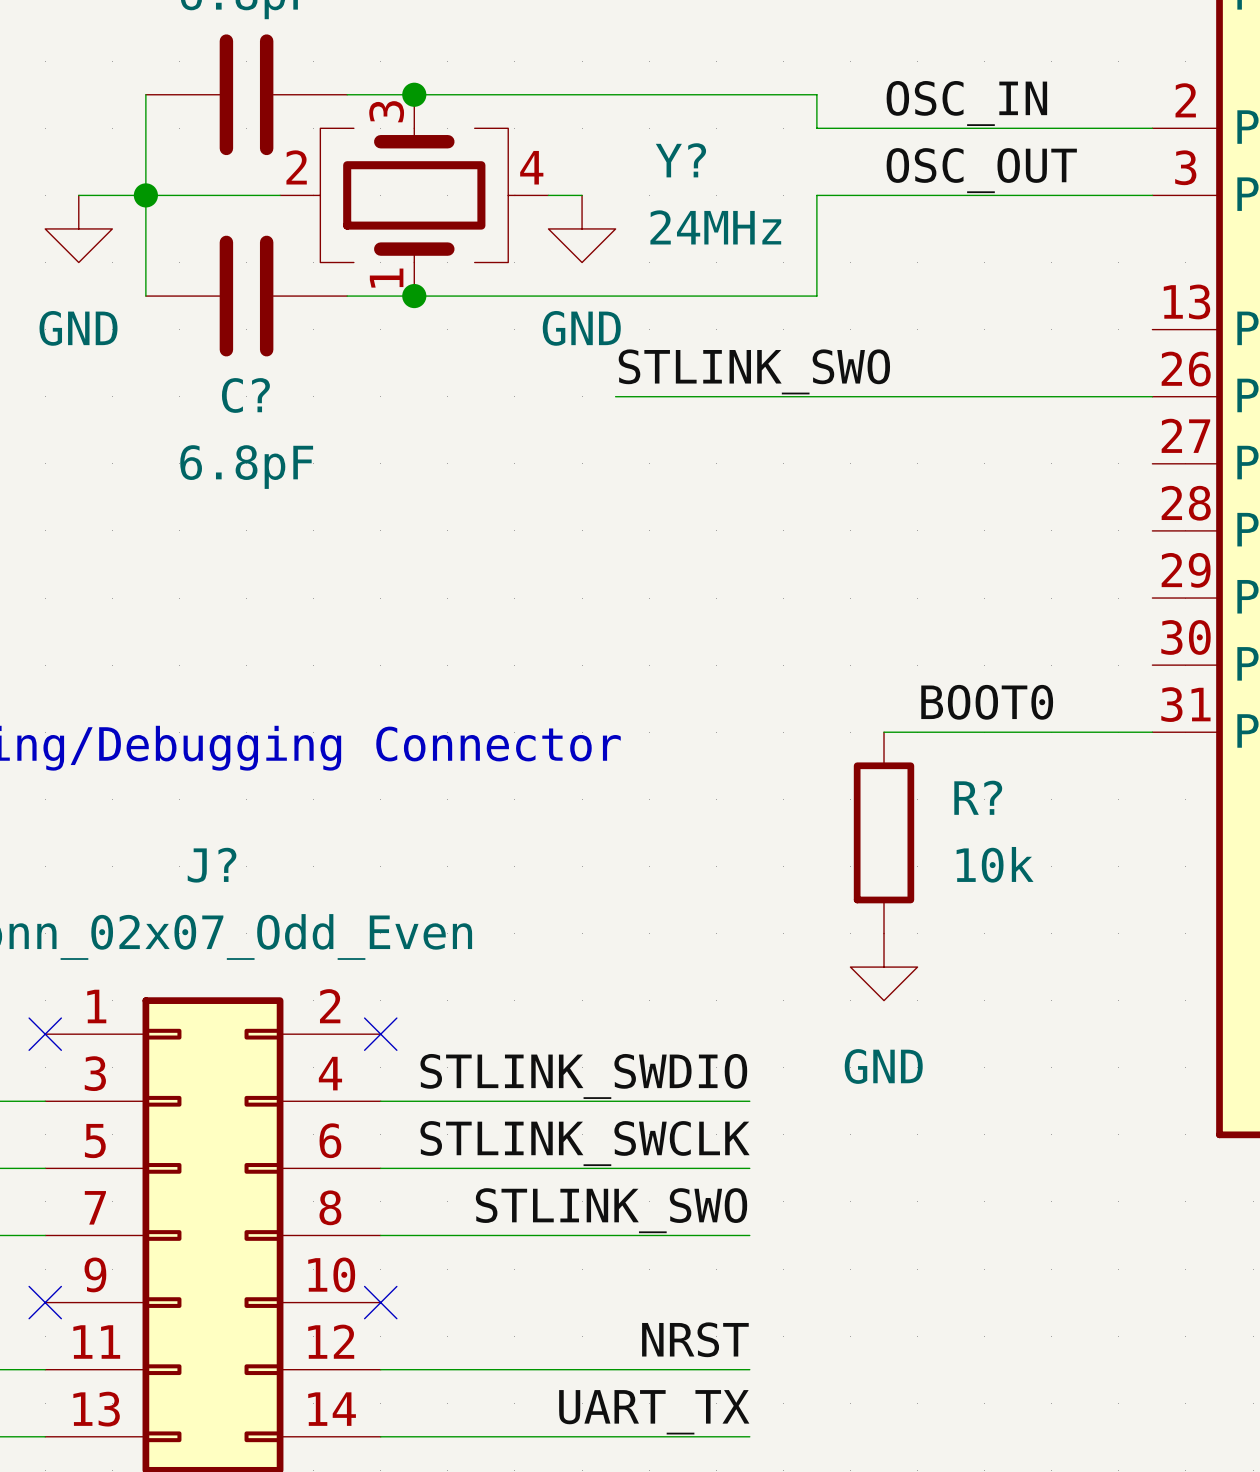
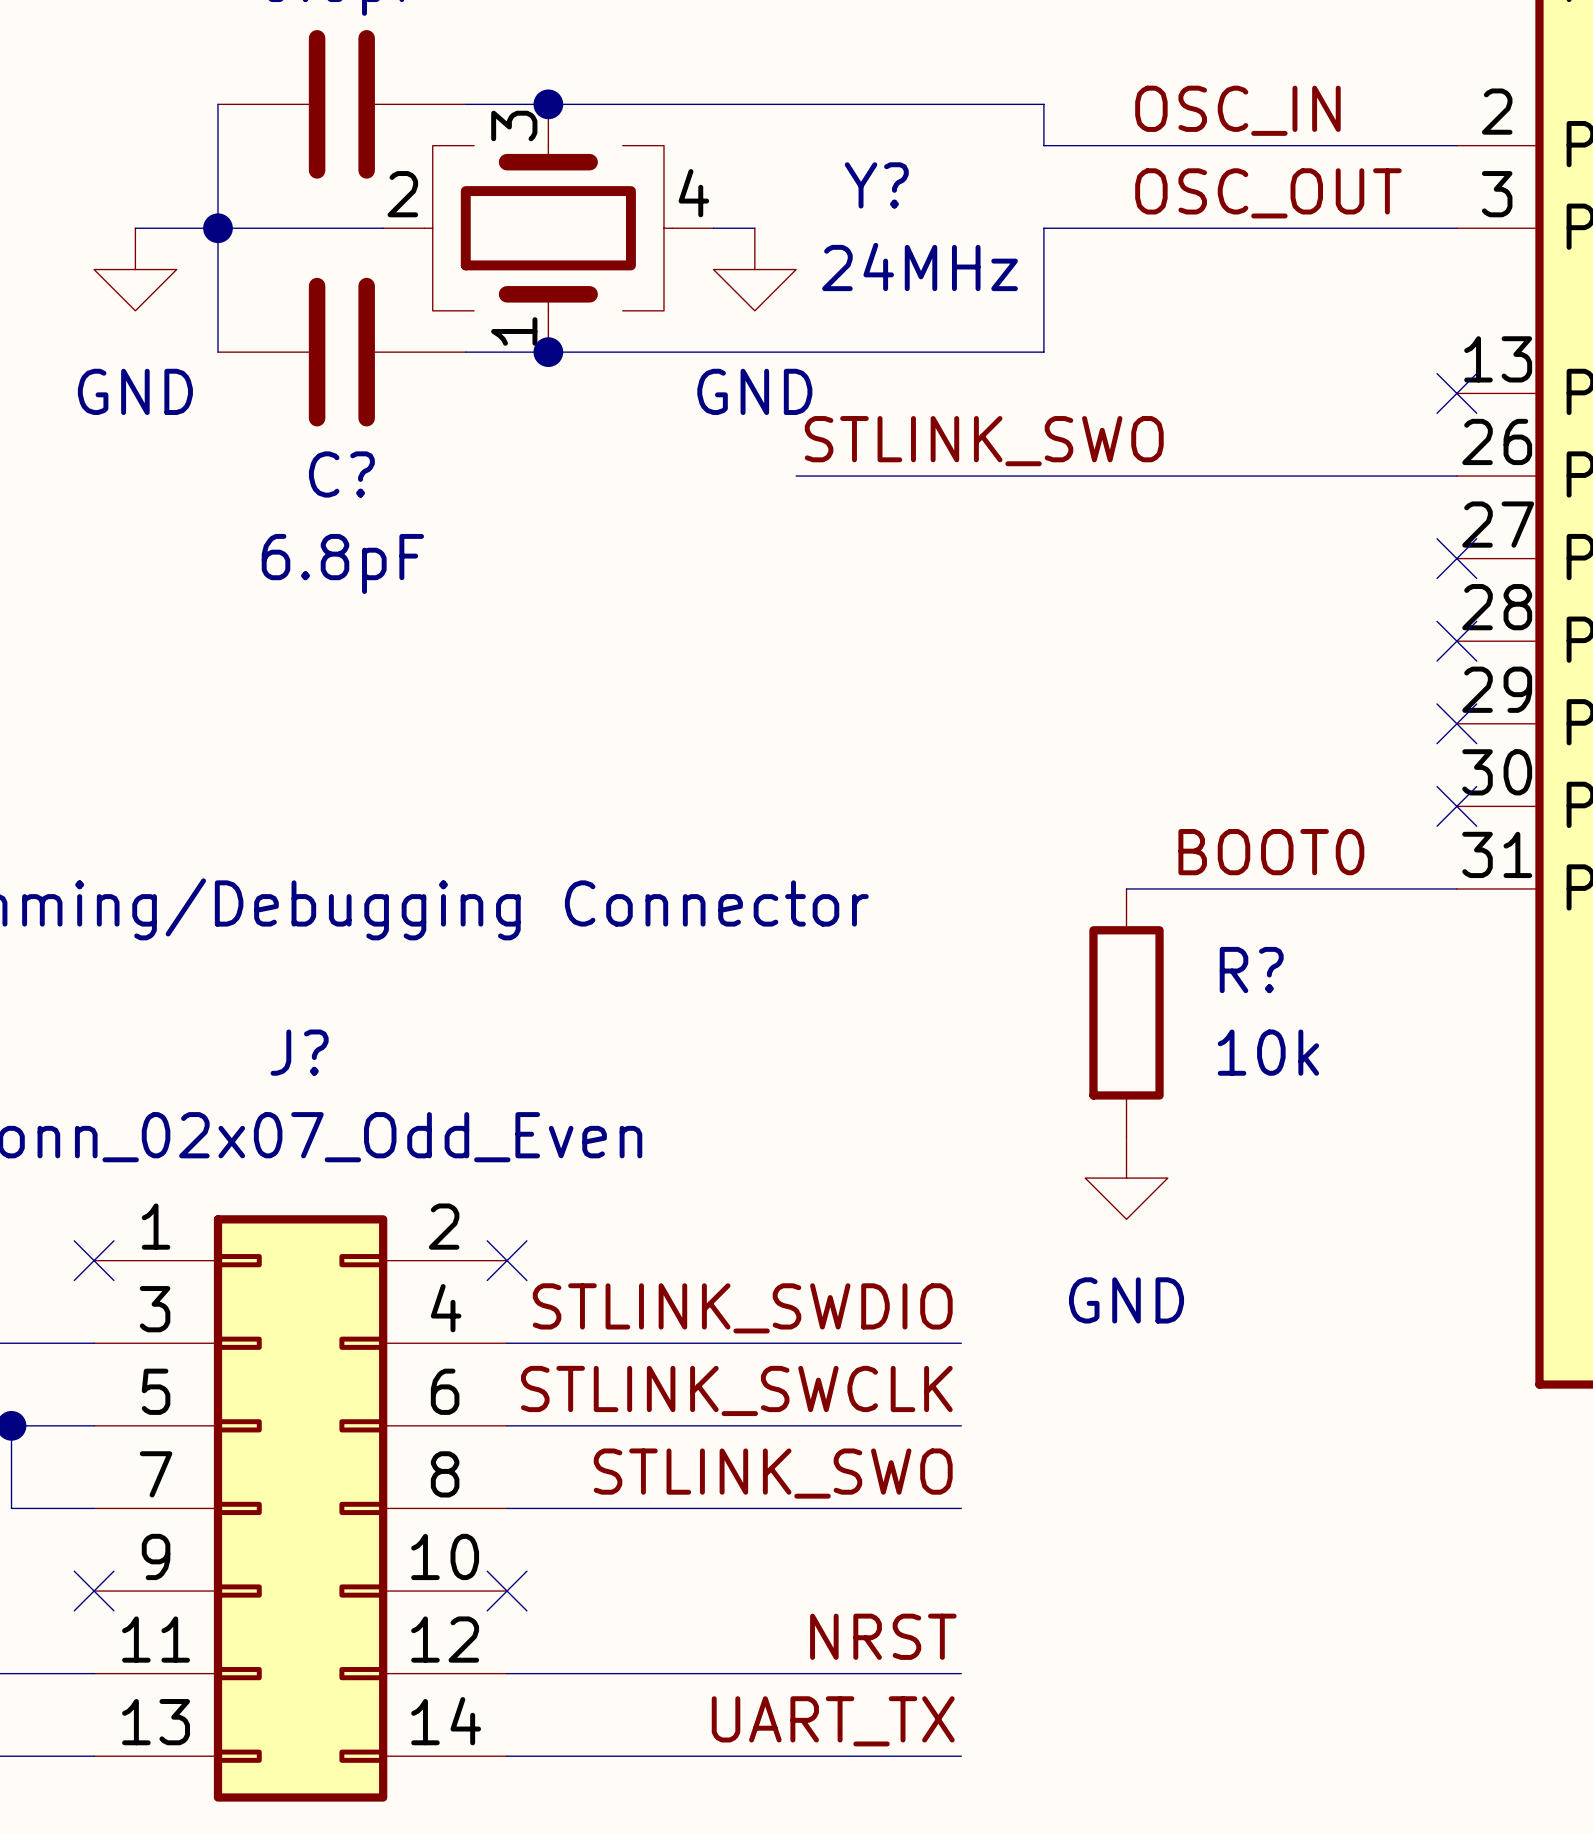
no-connect mark: none -> (1456, 393)
no-connect mark: none -> (1456, 558)
no-connect mark: none -> (1456, 641)
no-connect mark: none -> (1456, 723)
no-connect mark: none -> (1456, 806)

